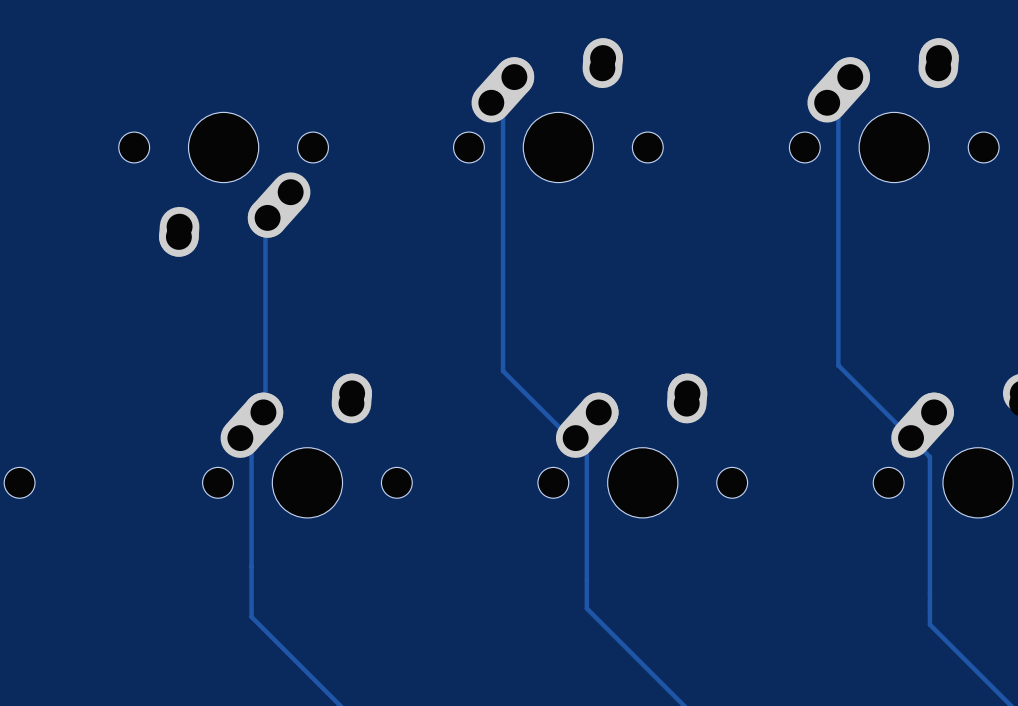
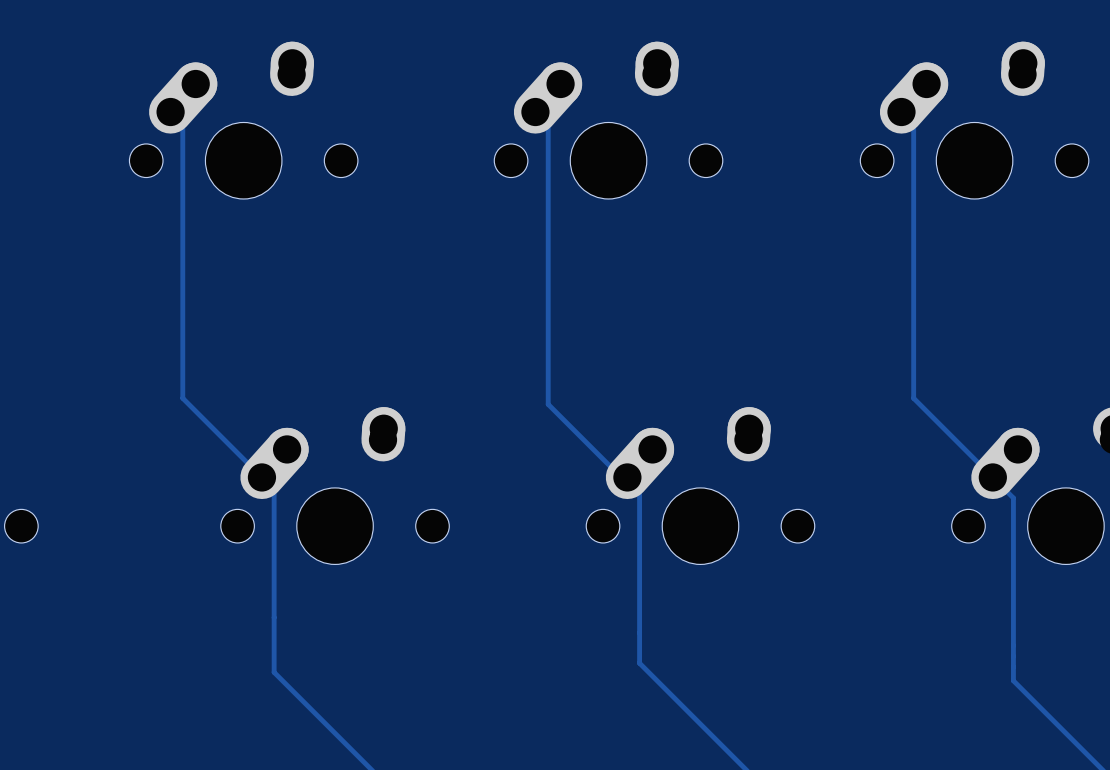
track: none -> (170, 112) (182, 124) (182, 398) (261, 477)
part rotation: 0° (223, 184) -> 180° (243, 120)
track: (290, 192) (265, 217) (265, 410) -> none

